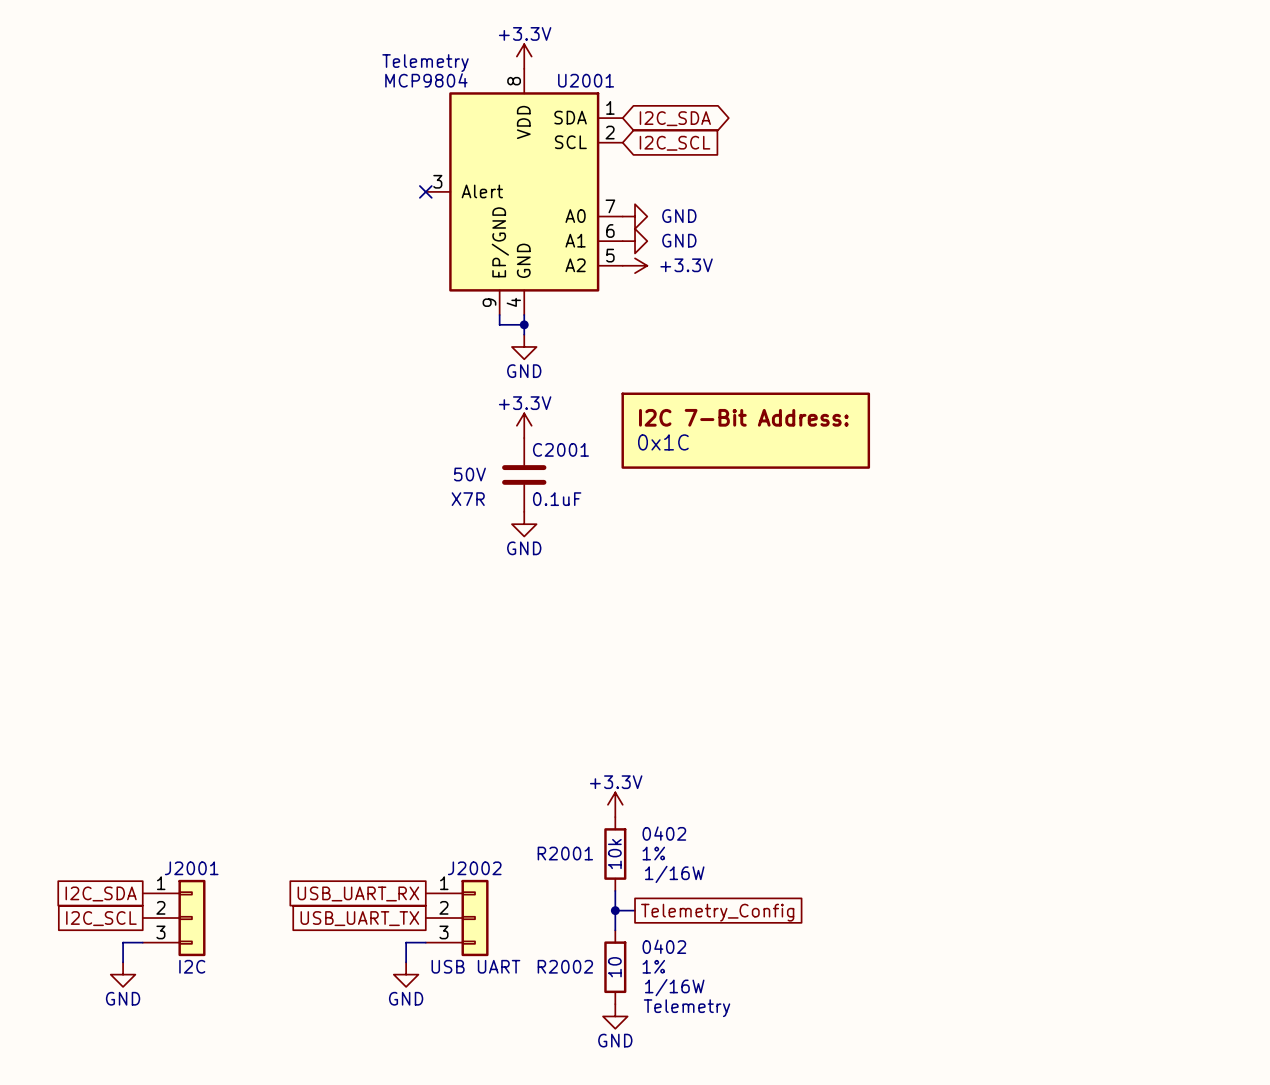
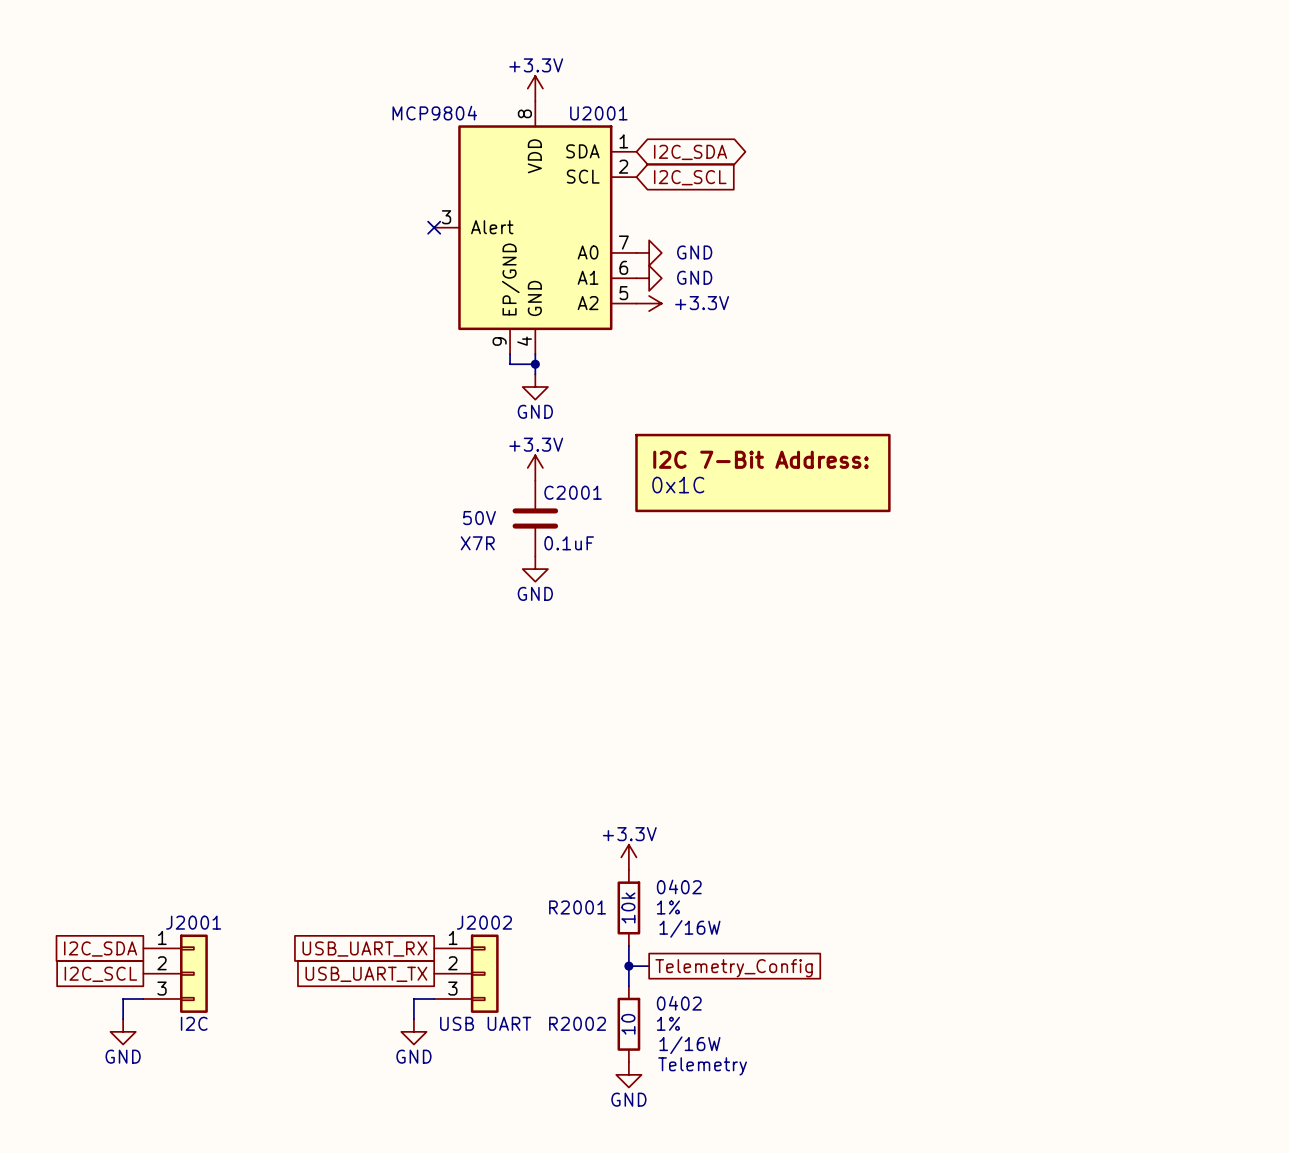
U2001 text: Telemetry (425, 63) -> none

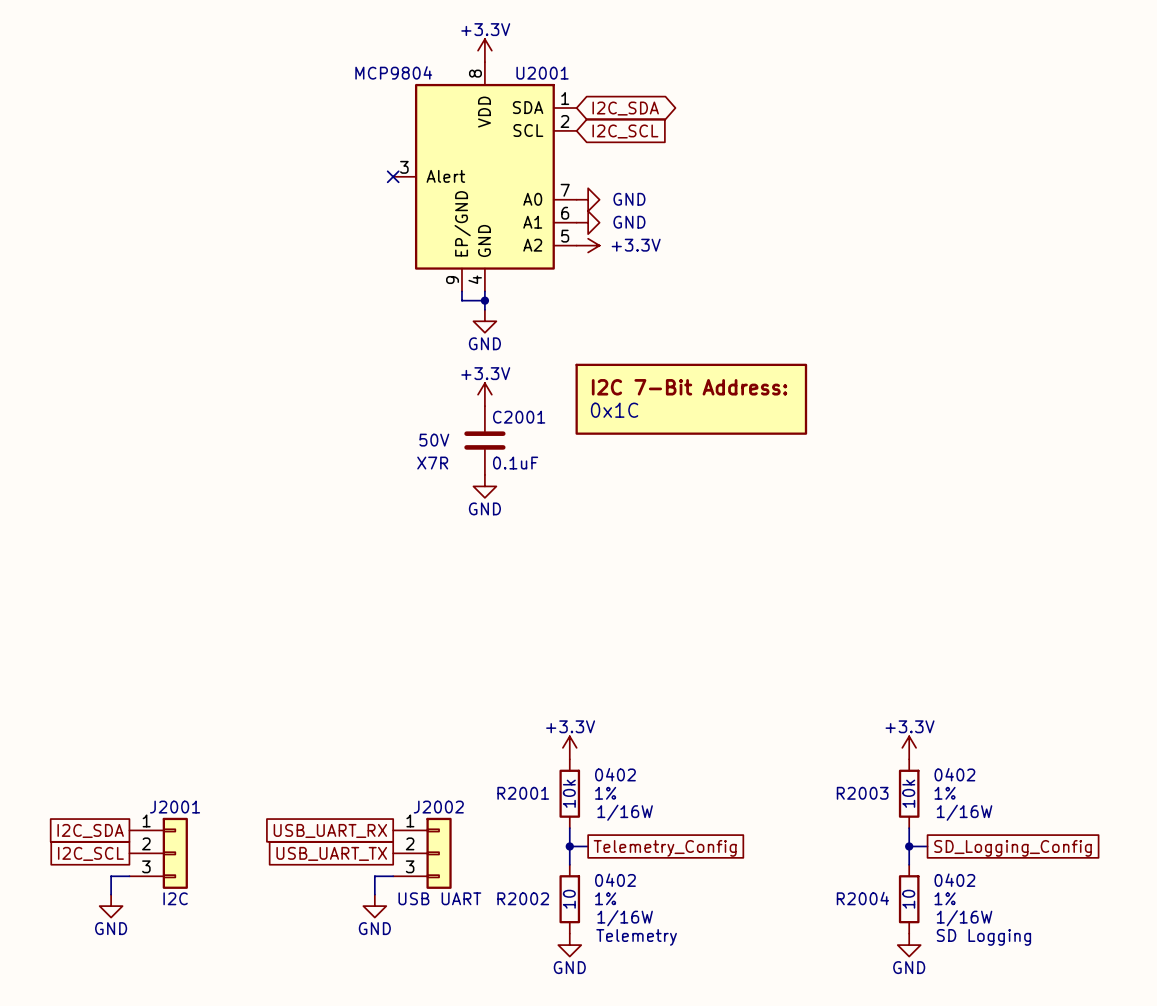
power symbol: none -> +3.3V (909, 747)
R2003: none -> 10k (909, 793)
wire: none -> (909, 828) (909, 864)
wire: none -> (909, 846) (927, 846)
junction: none -> (909, 846)
global label: none -> SD_Logging_Config (1013, 848)
R2004: none -> 10 (909, 899)
power symbol: none -> GND (909, 945)

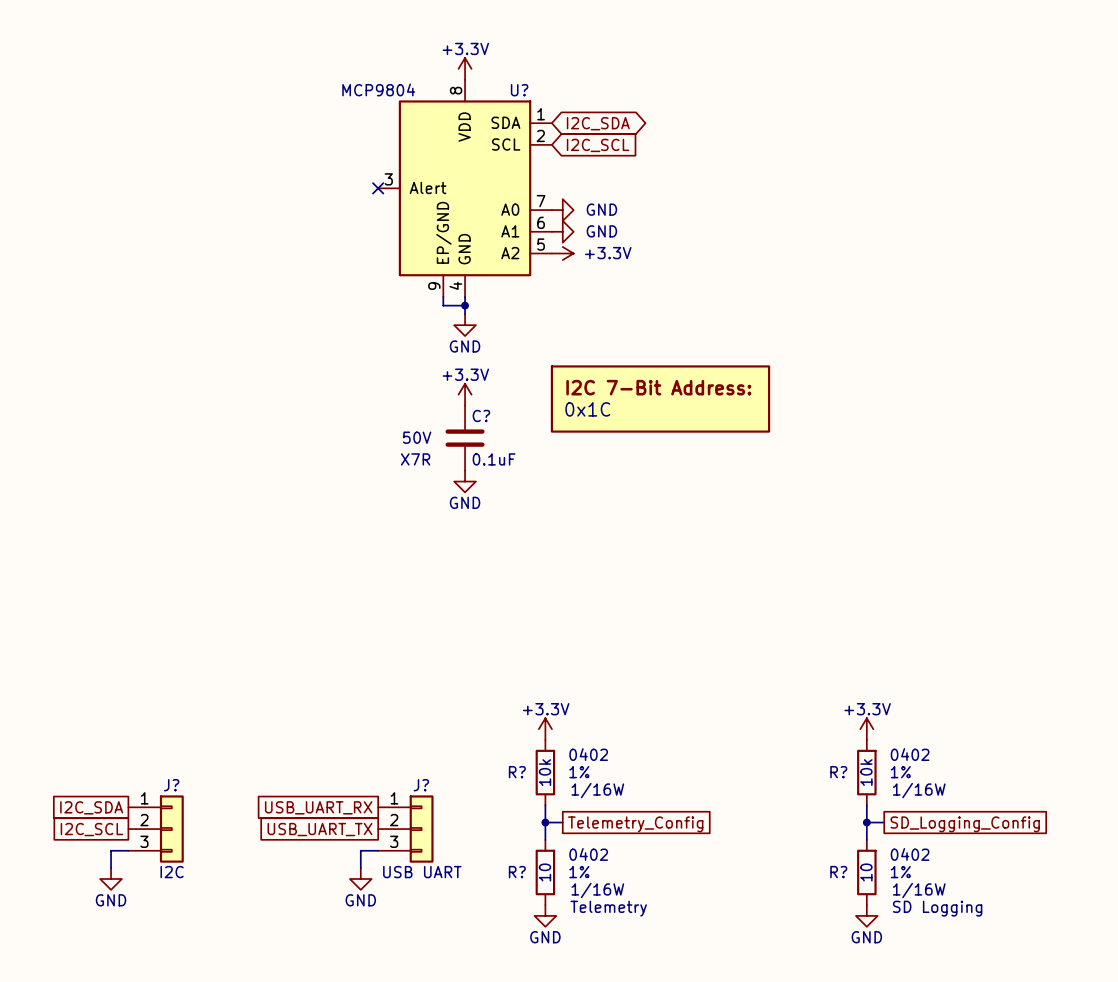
U2001 name: U2001 (542, 73) -> U? (519, 90)
C2001 name: C2001 (519, 417) -> C? (481, 415)
R2001 name: R2001 (523, 793) -> R? (517, 772)
R2003 name: R2003 (862, 793) -> R? (838, 772)
J2001 name: J2001 (175, 807) -> J? (171, 785)
J2002 name: J2002 (438, 807) -> J? (421, 785)
R2002 name: R2002 (523, 898) -> R? (517, 872)
R2004 name: R2004 (862, 898) -> R? (838, 872)

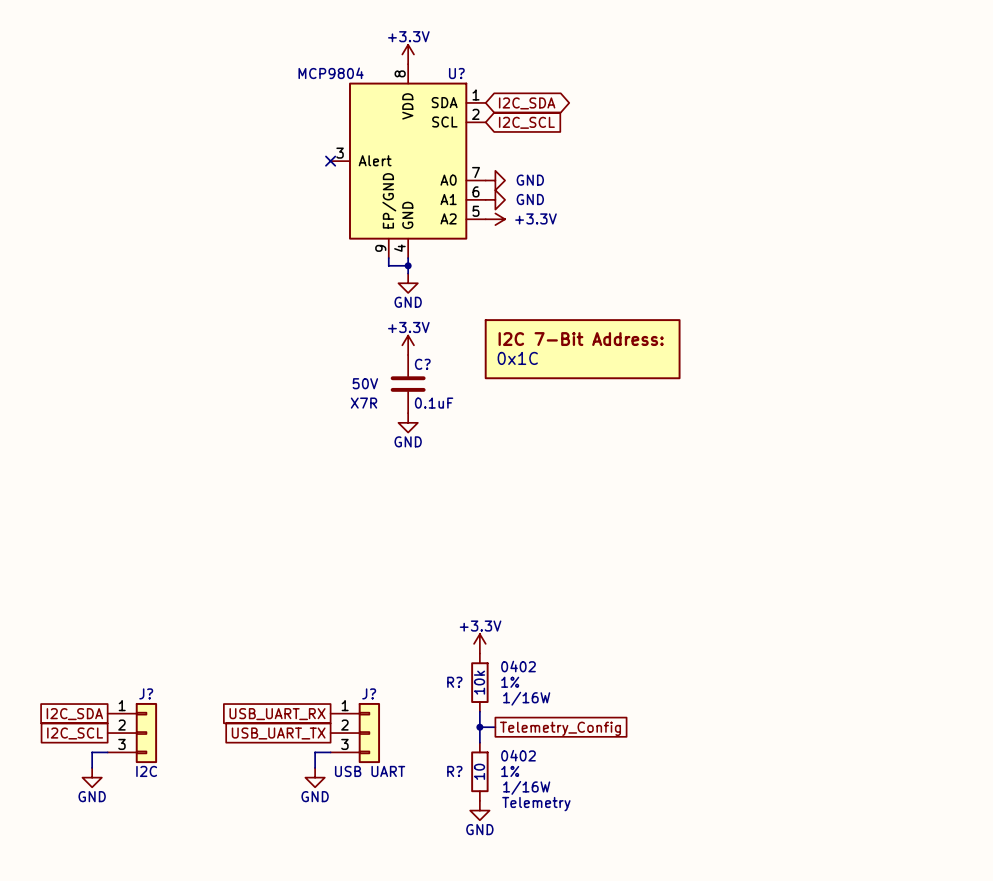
power symbol: +3.3V (866, 729) -> none
R?: 10k (866, 772) -> none
wire: (866, 805) (866, 839) -> none
wire: (866, 822) (884, 822) -> none
junction: (866, 822) -> none
global label: SD_Logging_Config (965, 824) -> none
R?: 10 (866, 872) -> none
power symbol: GND (866, 915) -> none

